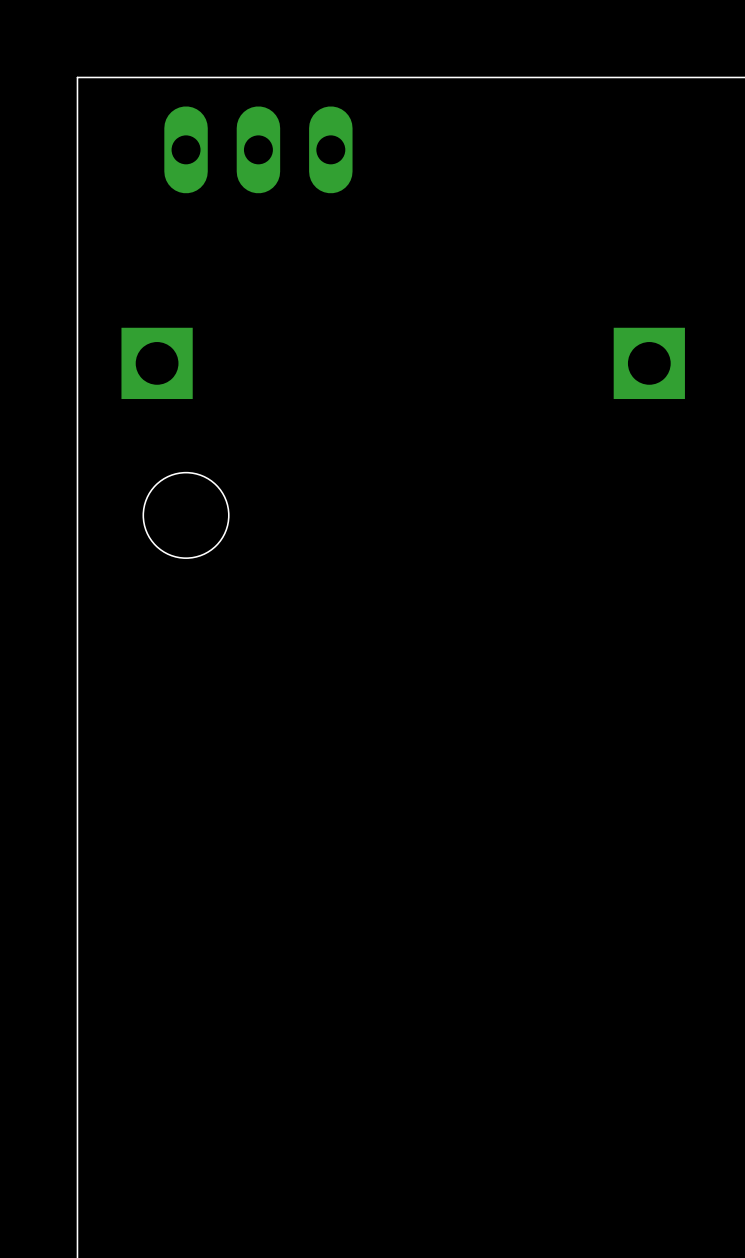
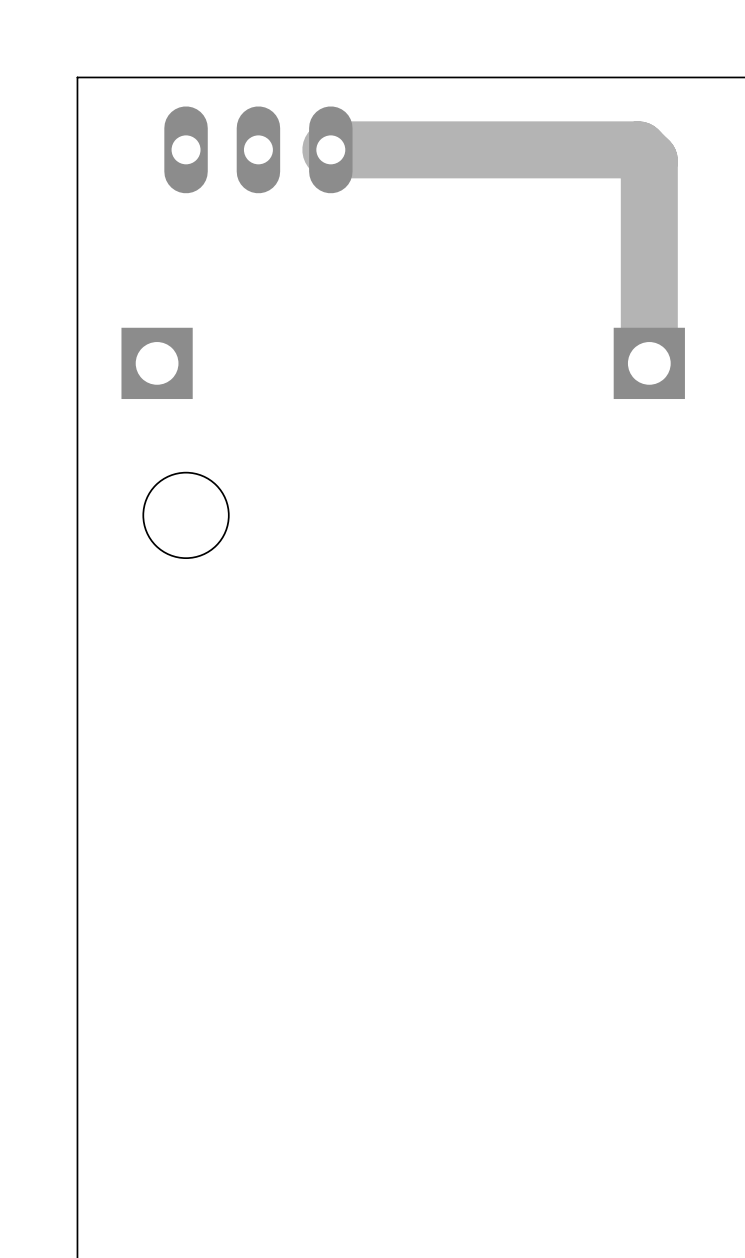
track: none -> (330, 149) (638, 149) (649, 160) (649, 363)

